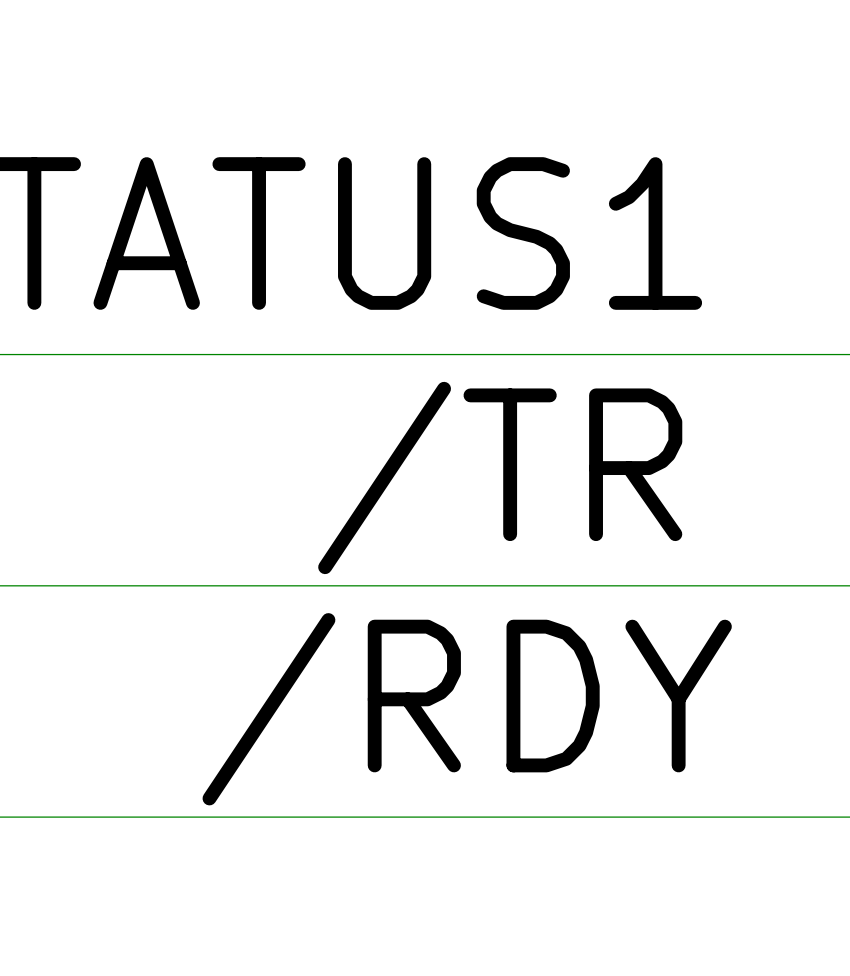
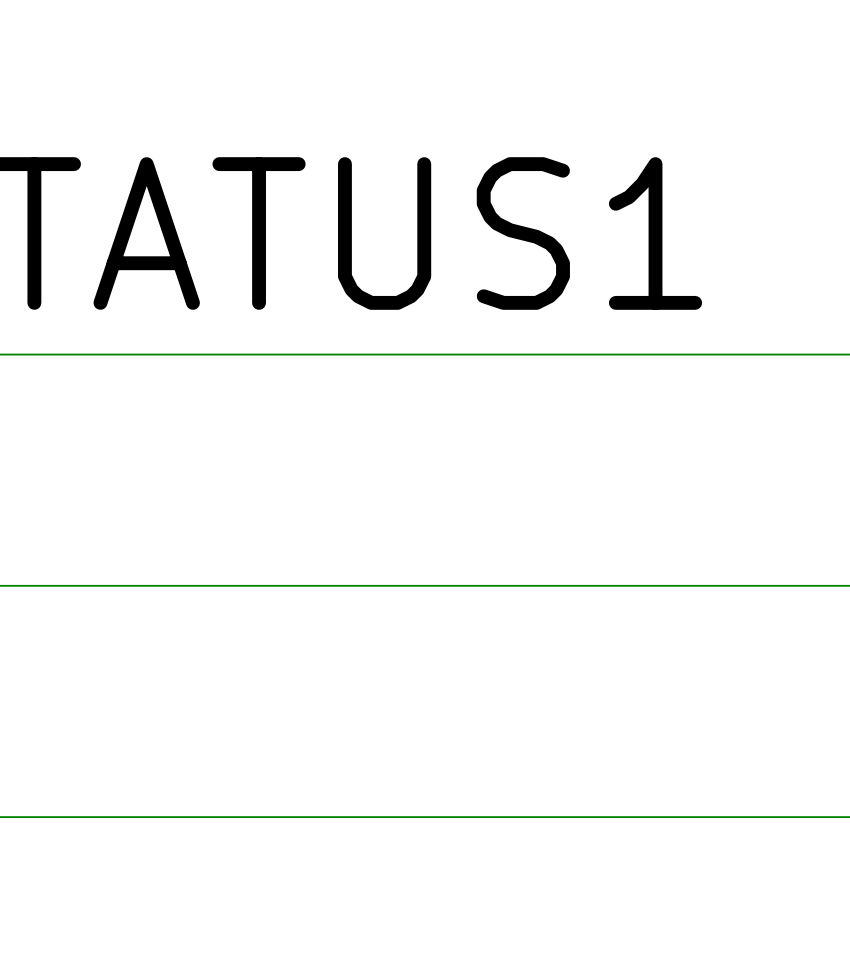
label: /TR (500, 477) -> none
label: /RDY (467, 709) -> none

